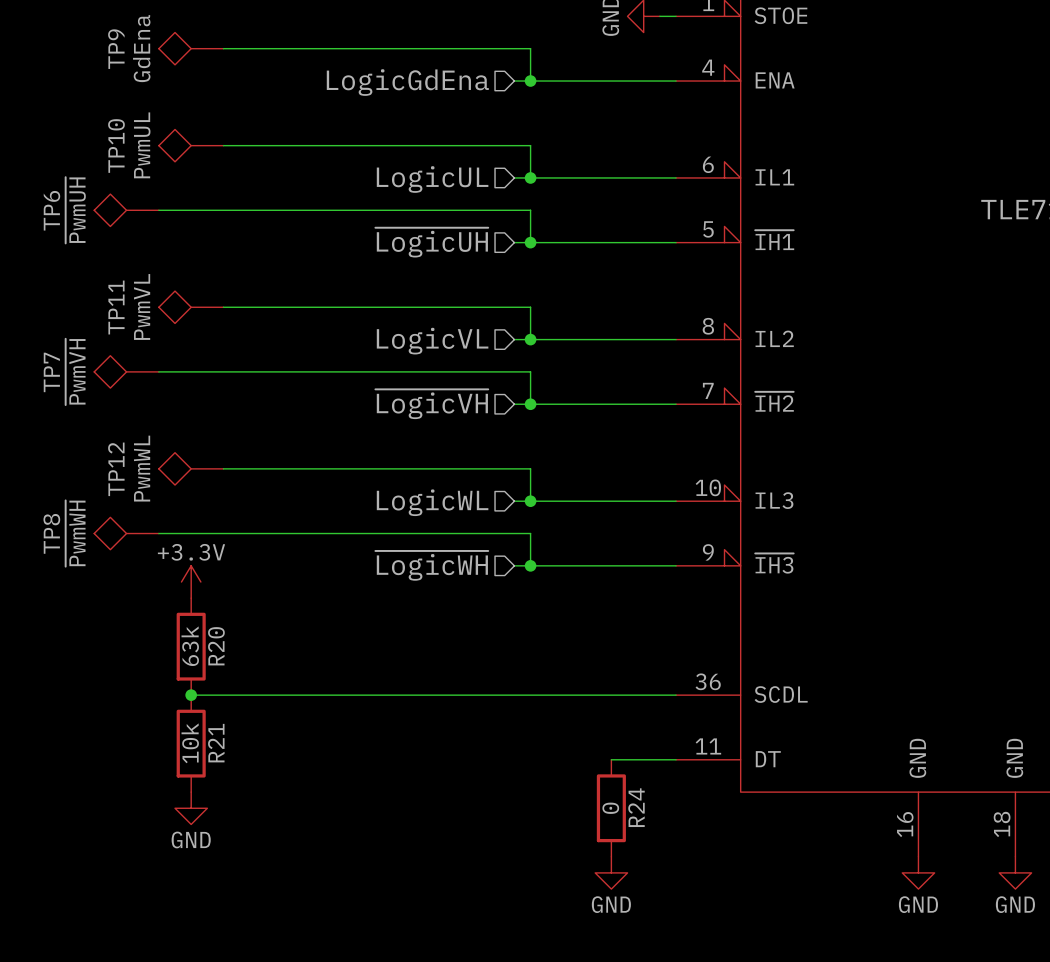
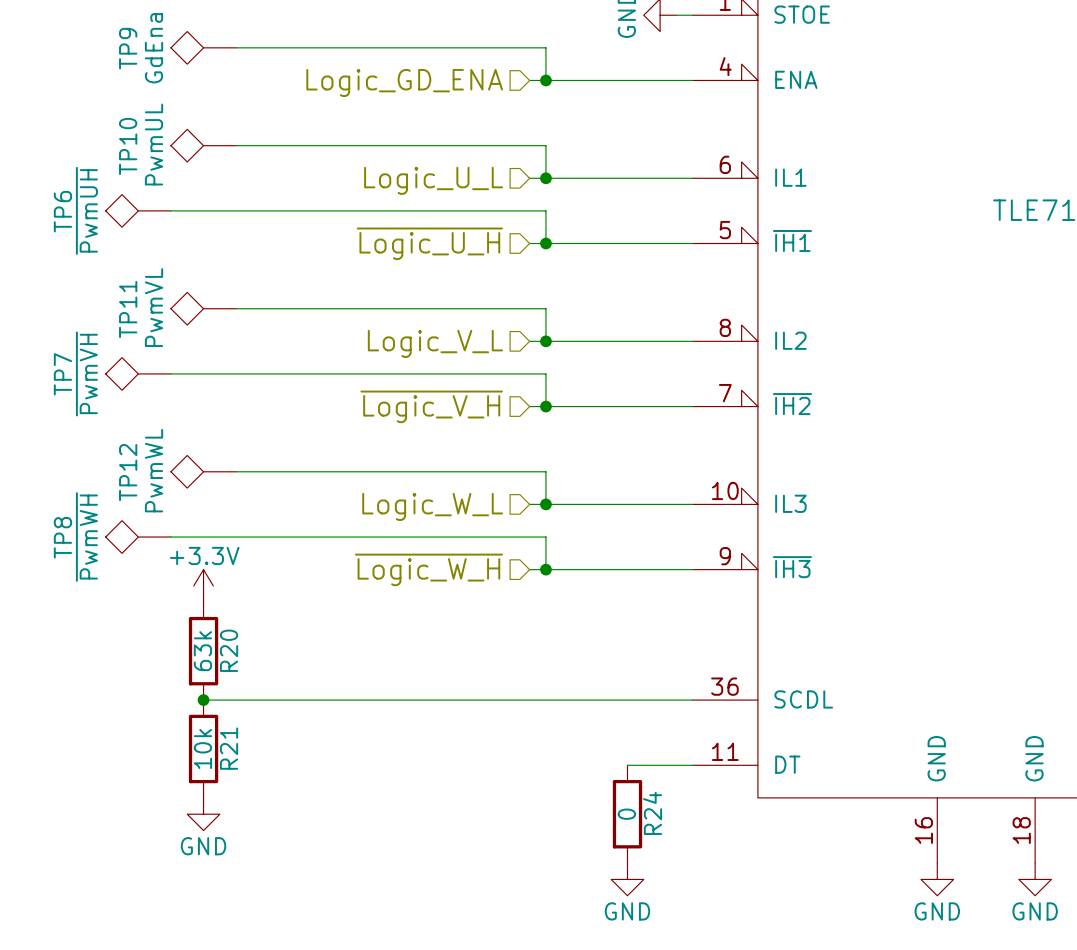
hierarchical label: LogicGdEna (407, 82) -> Logic_GD_ENA (404, 82)
hierarchical label: LogicUL (432, 179) -> Logic_U_L (433, 180)
hierarchical label: ~{LogicUH} (431, 242) -> ~{Logic_U_H} (429, 243)
hierarchical label: LogicVL (432, 341) -> Logic_V_L (435, 343)
hierarchical label: ~{LogicVH} (431, 404) -> ~{Logic_V_H} (431, 406)
hierarchical label: LogicWL (432, 502) -> Logic_W_L (432, 506)
hierarchical label: ~{LogicWH} (431, 565) -> ~{Logic_W_H} (428, 569)

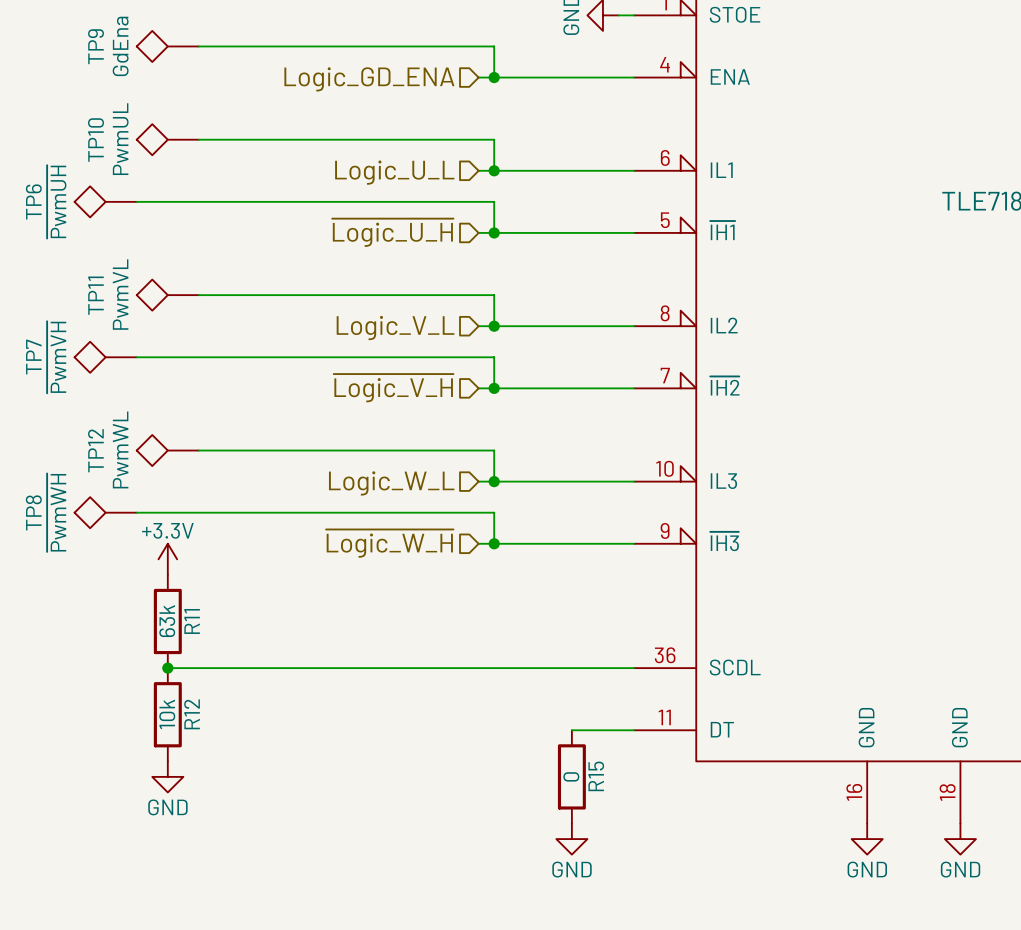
R20 name: R20 (229, 650) -> R11 (192, 621)
R21 name: R21 (229, 748) -> R12 (192, 714)
R24 name: R24 (652, 813) -> R15 (596, 776)

